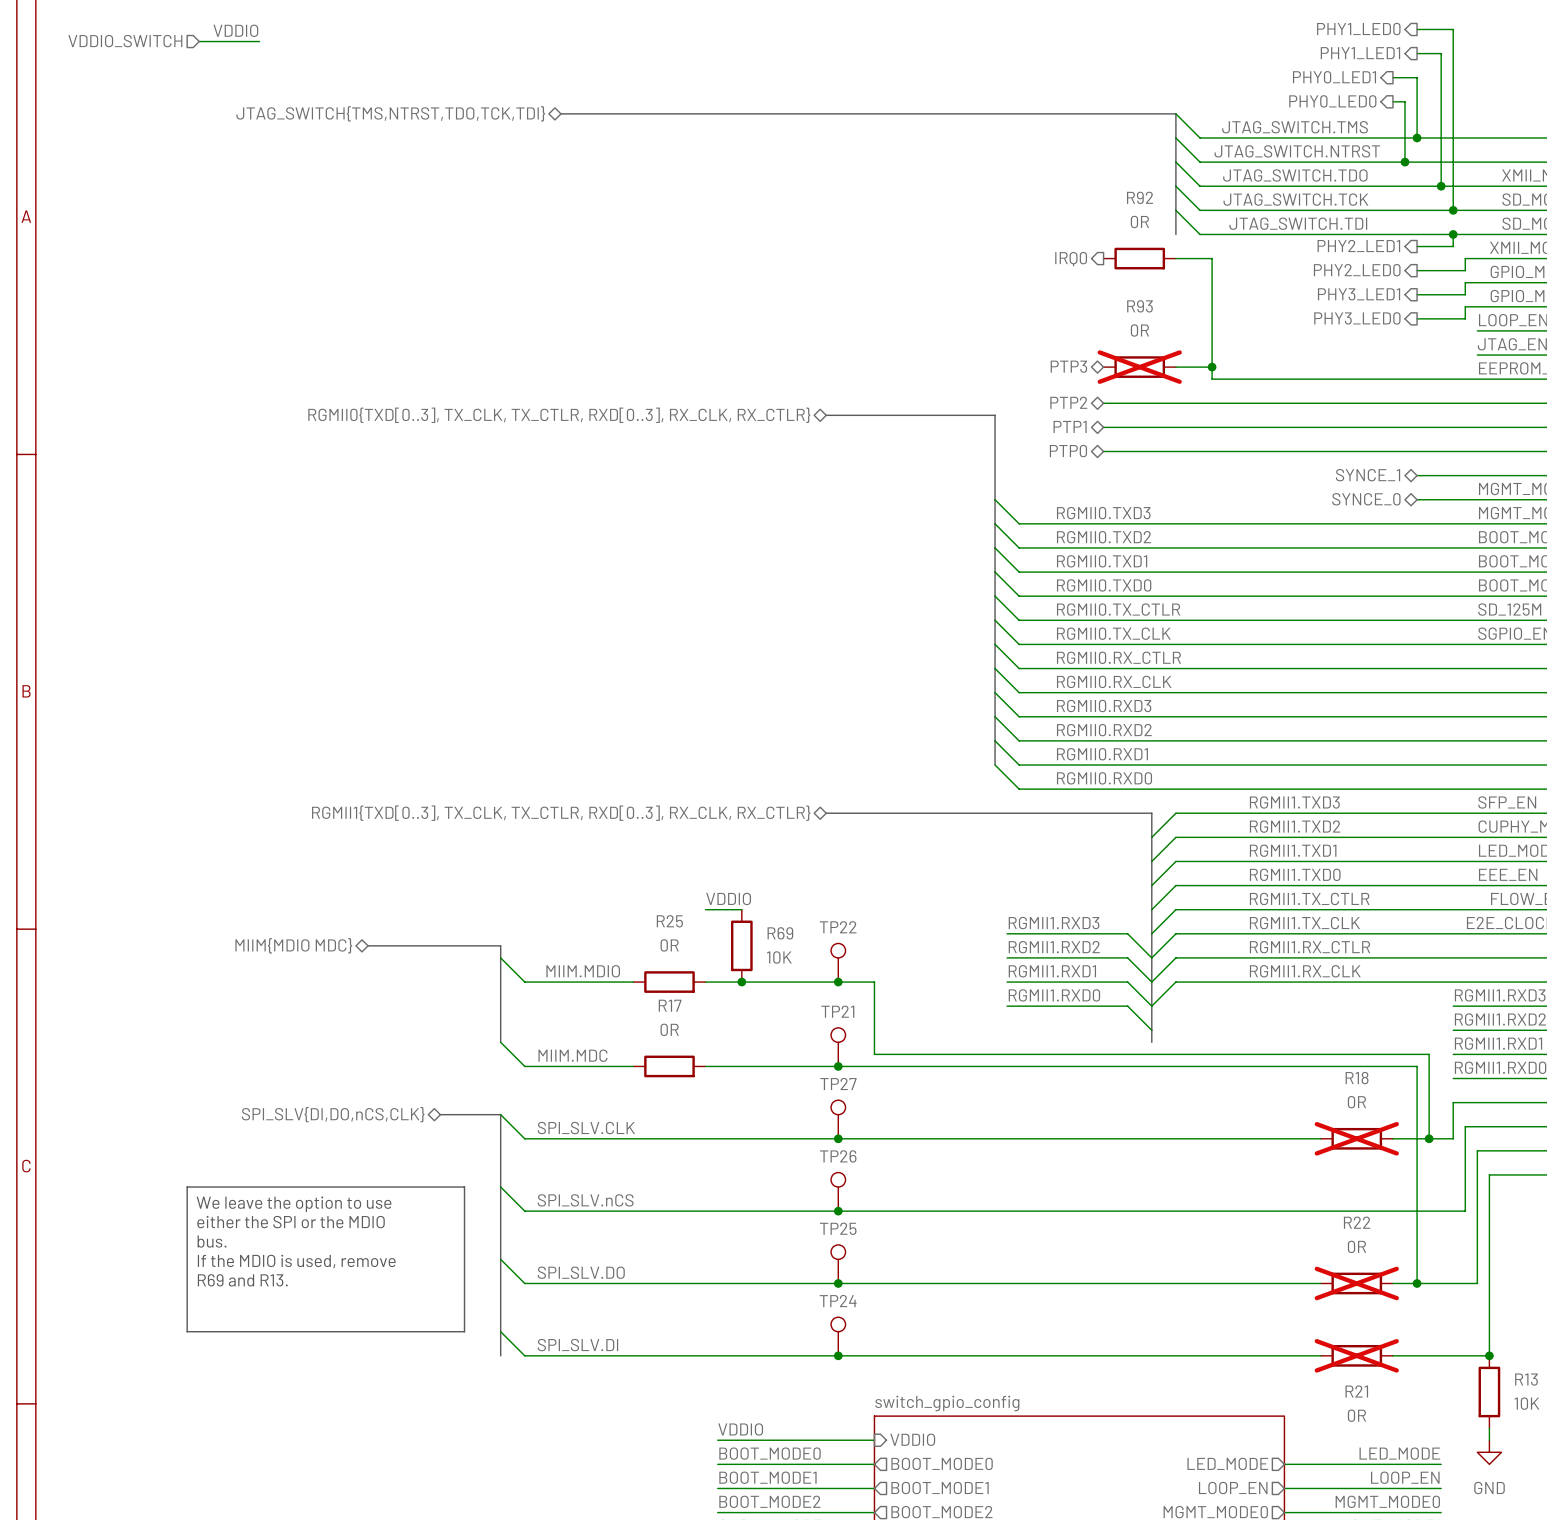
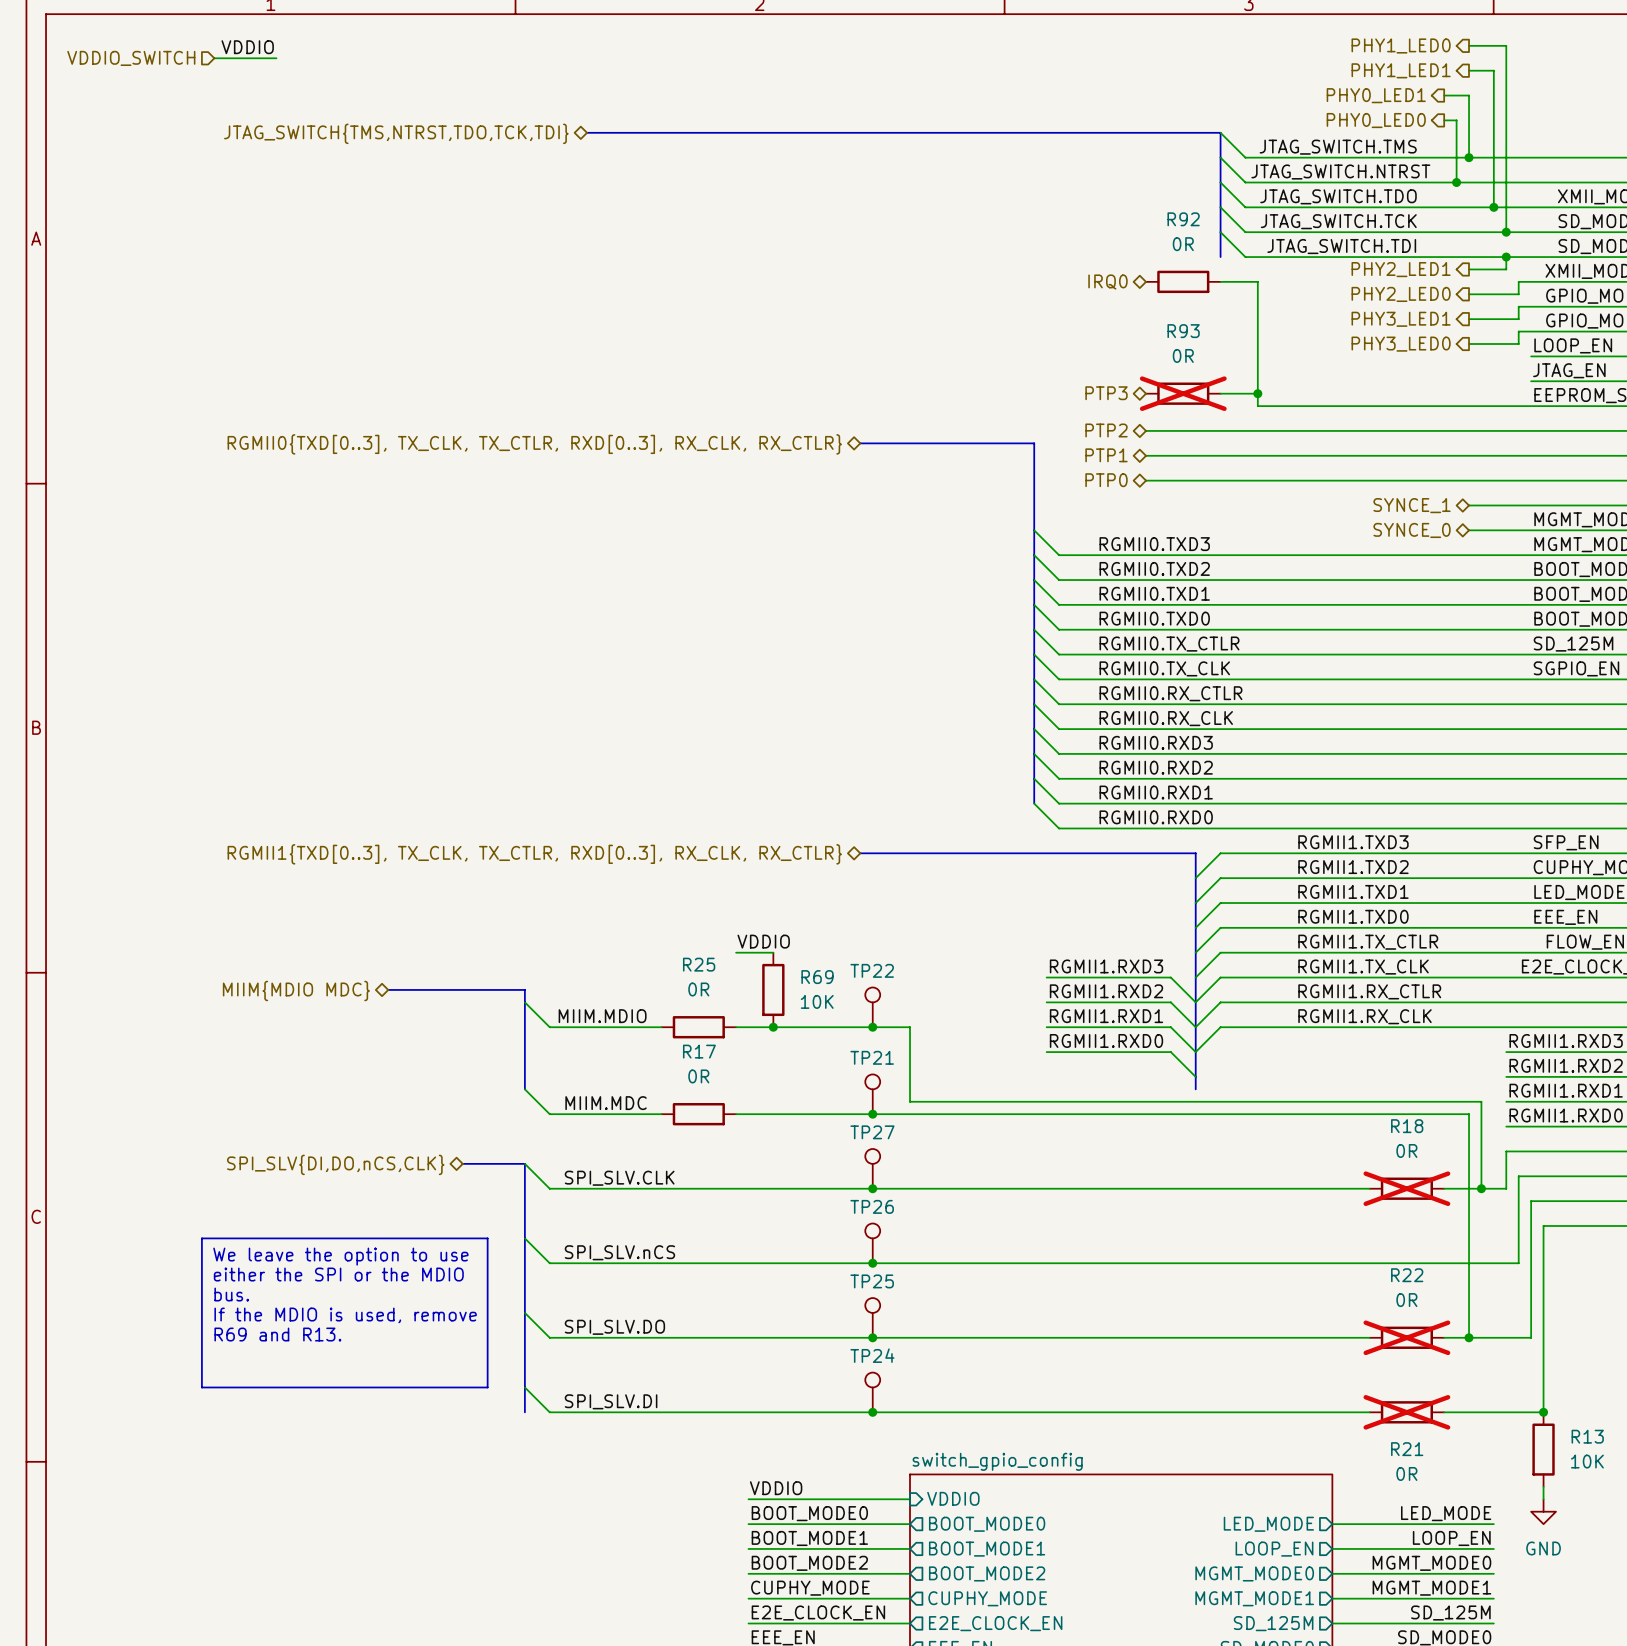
hierarchical label shape: output (1071, 259) -> bidirectional (1107, 282)

